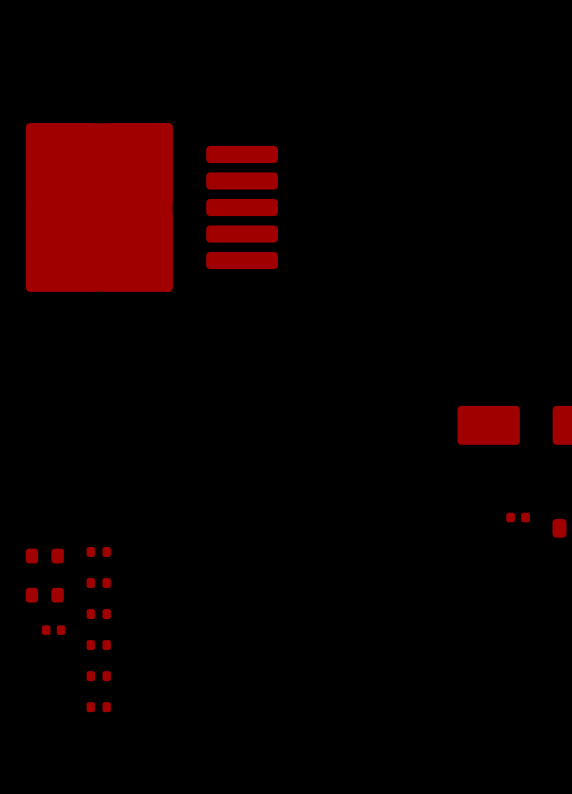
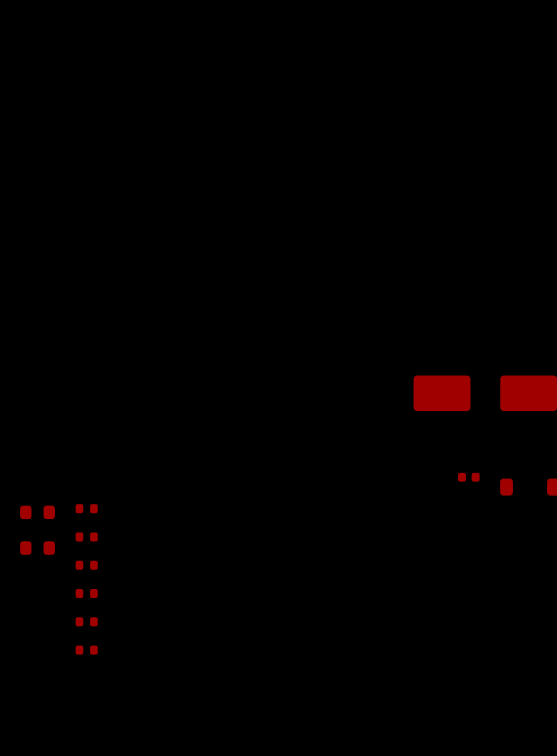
part: (151, 207) -> none
part: (53, 630) -> none

